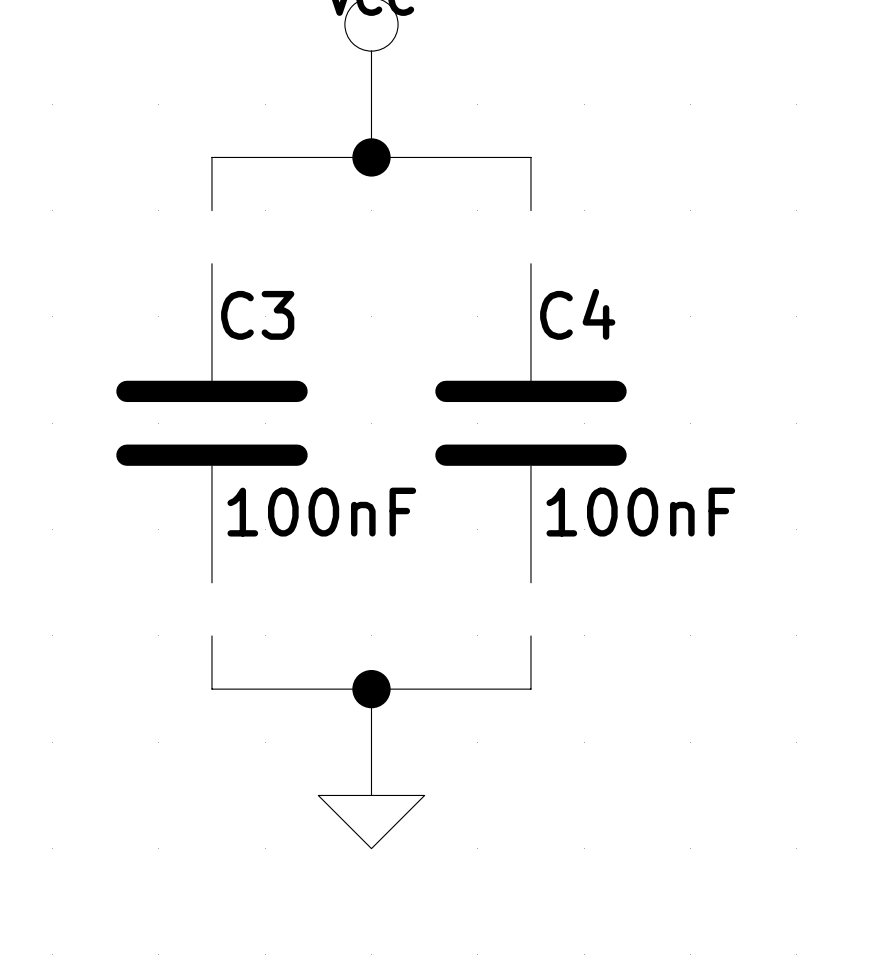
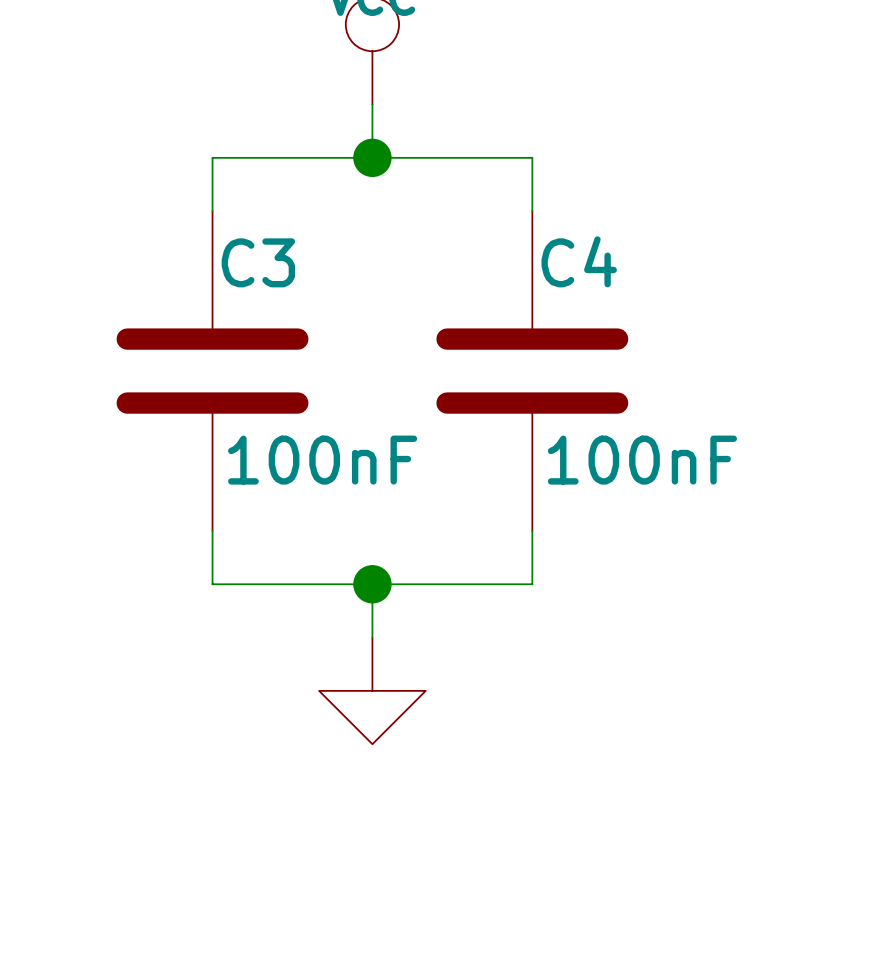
C3 position: (211, 423) -> (212, 371)
C4 position: (530, 423) -> (532, 371)
wire: (211, 635) (211, 689) (530, 689) (530, 635) -> (212, 530) (212, 584) (532, 584) (532, 530)
wire: (371, 689) (371, 742) -> (372, 584) (372, 637)
junction position: (371, 689) -> (372, 584)
power symbol position: (371, 795) -> (372, 690)

